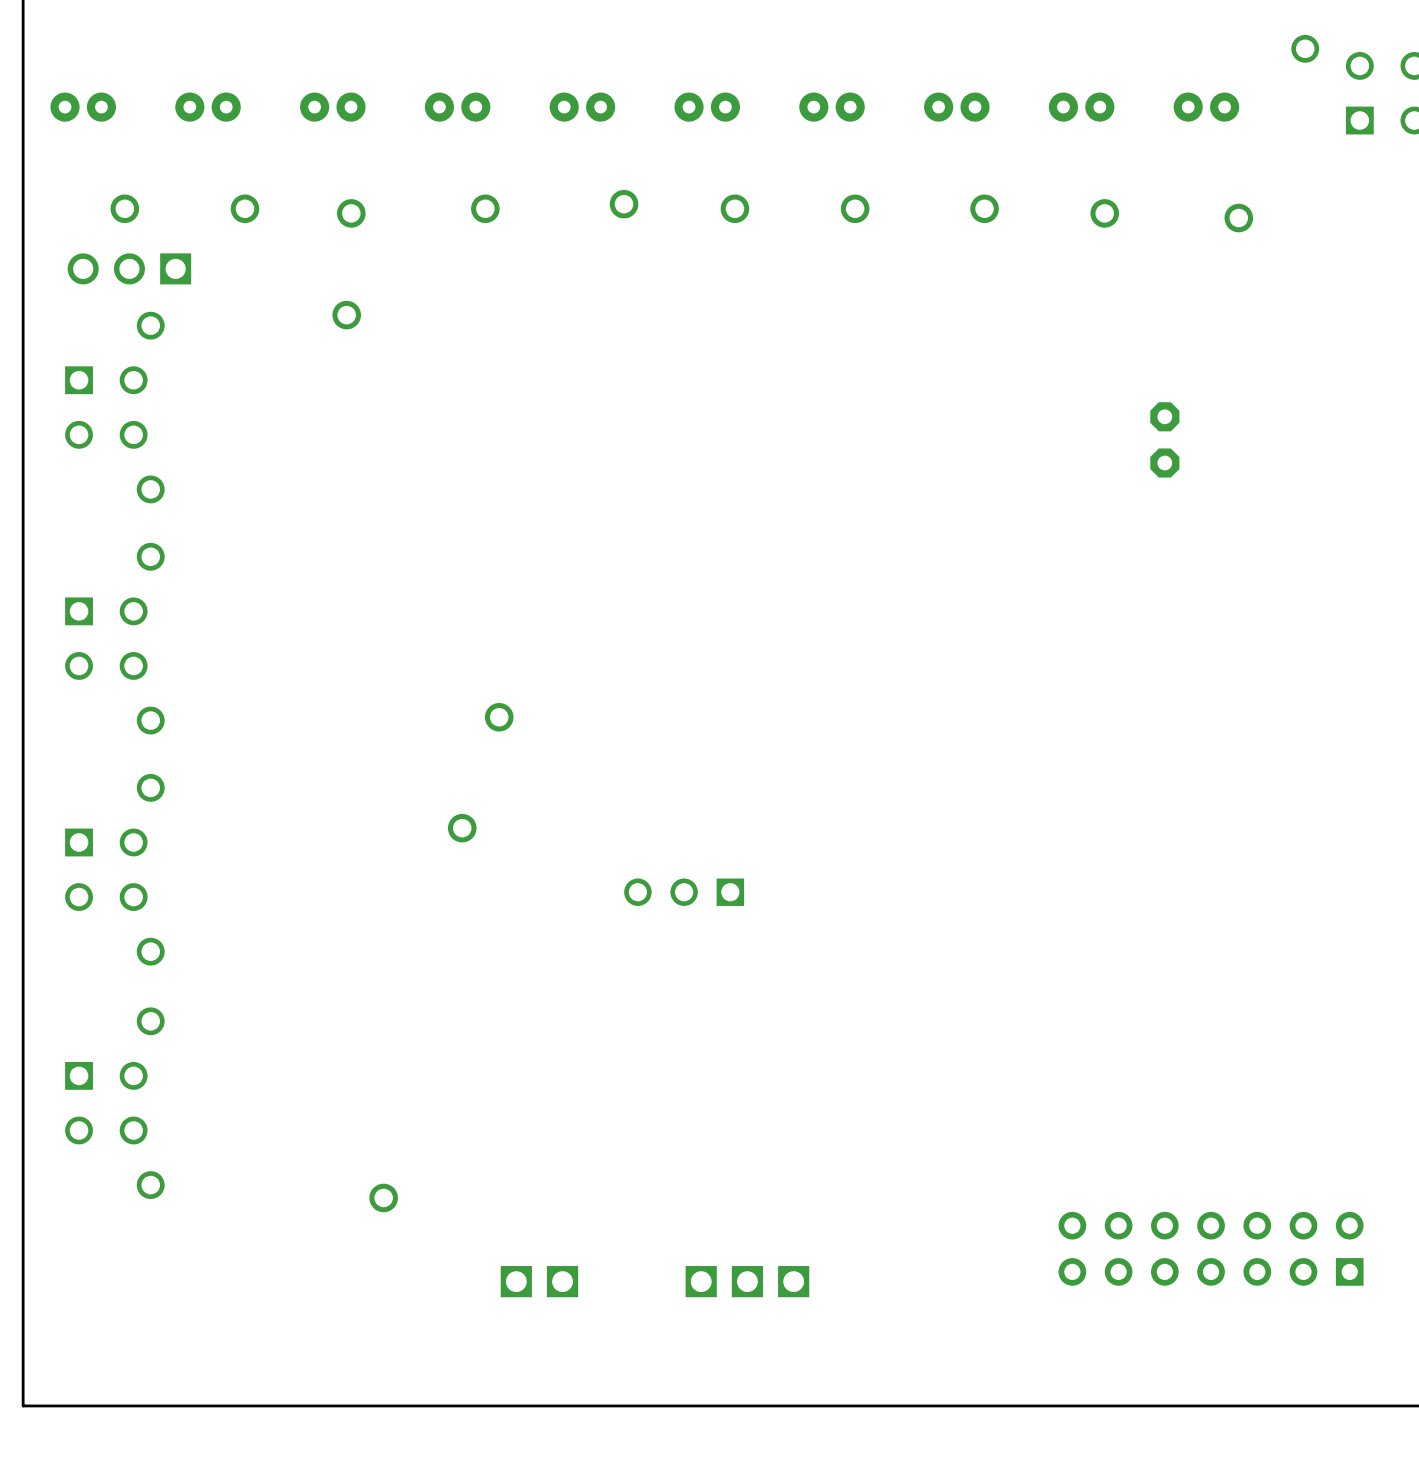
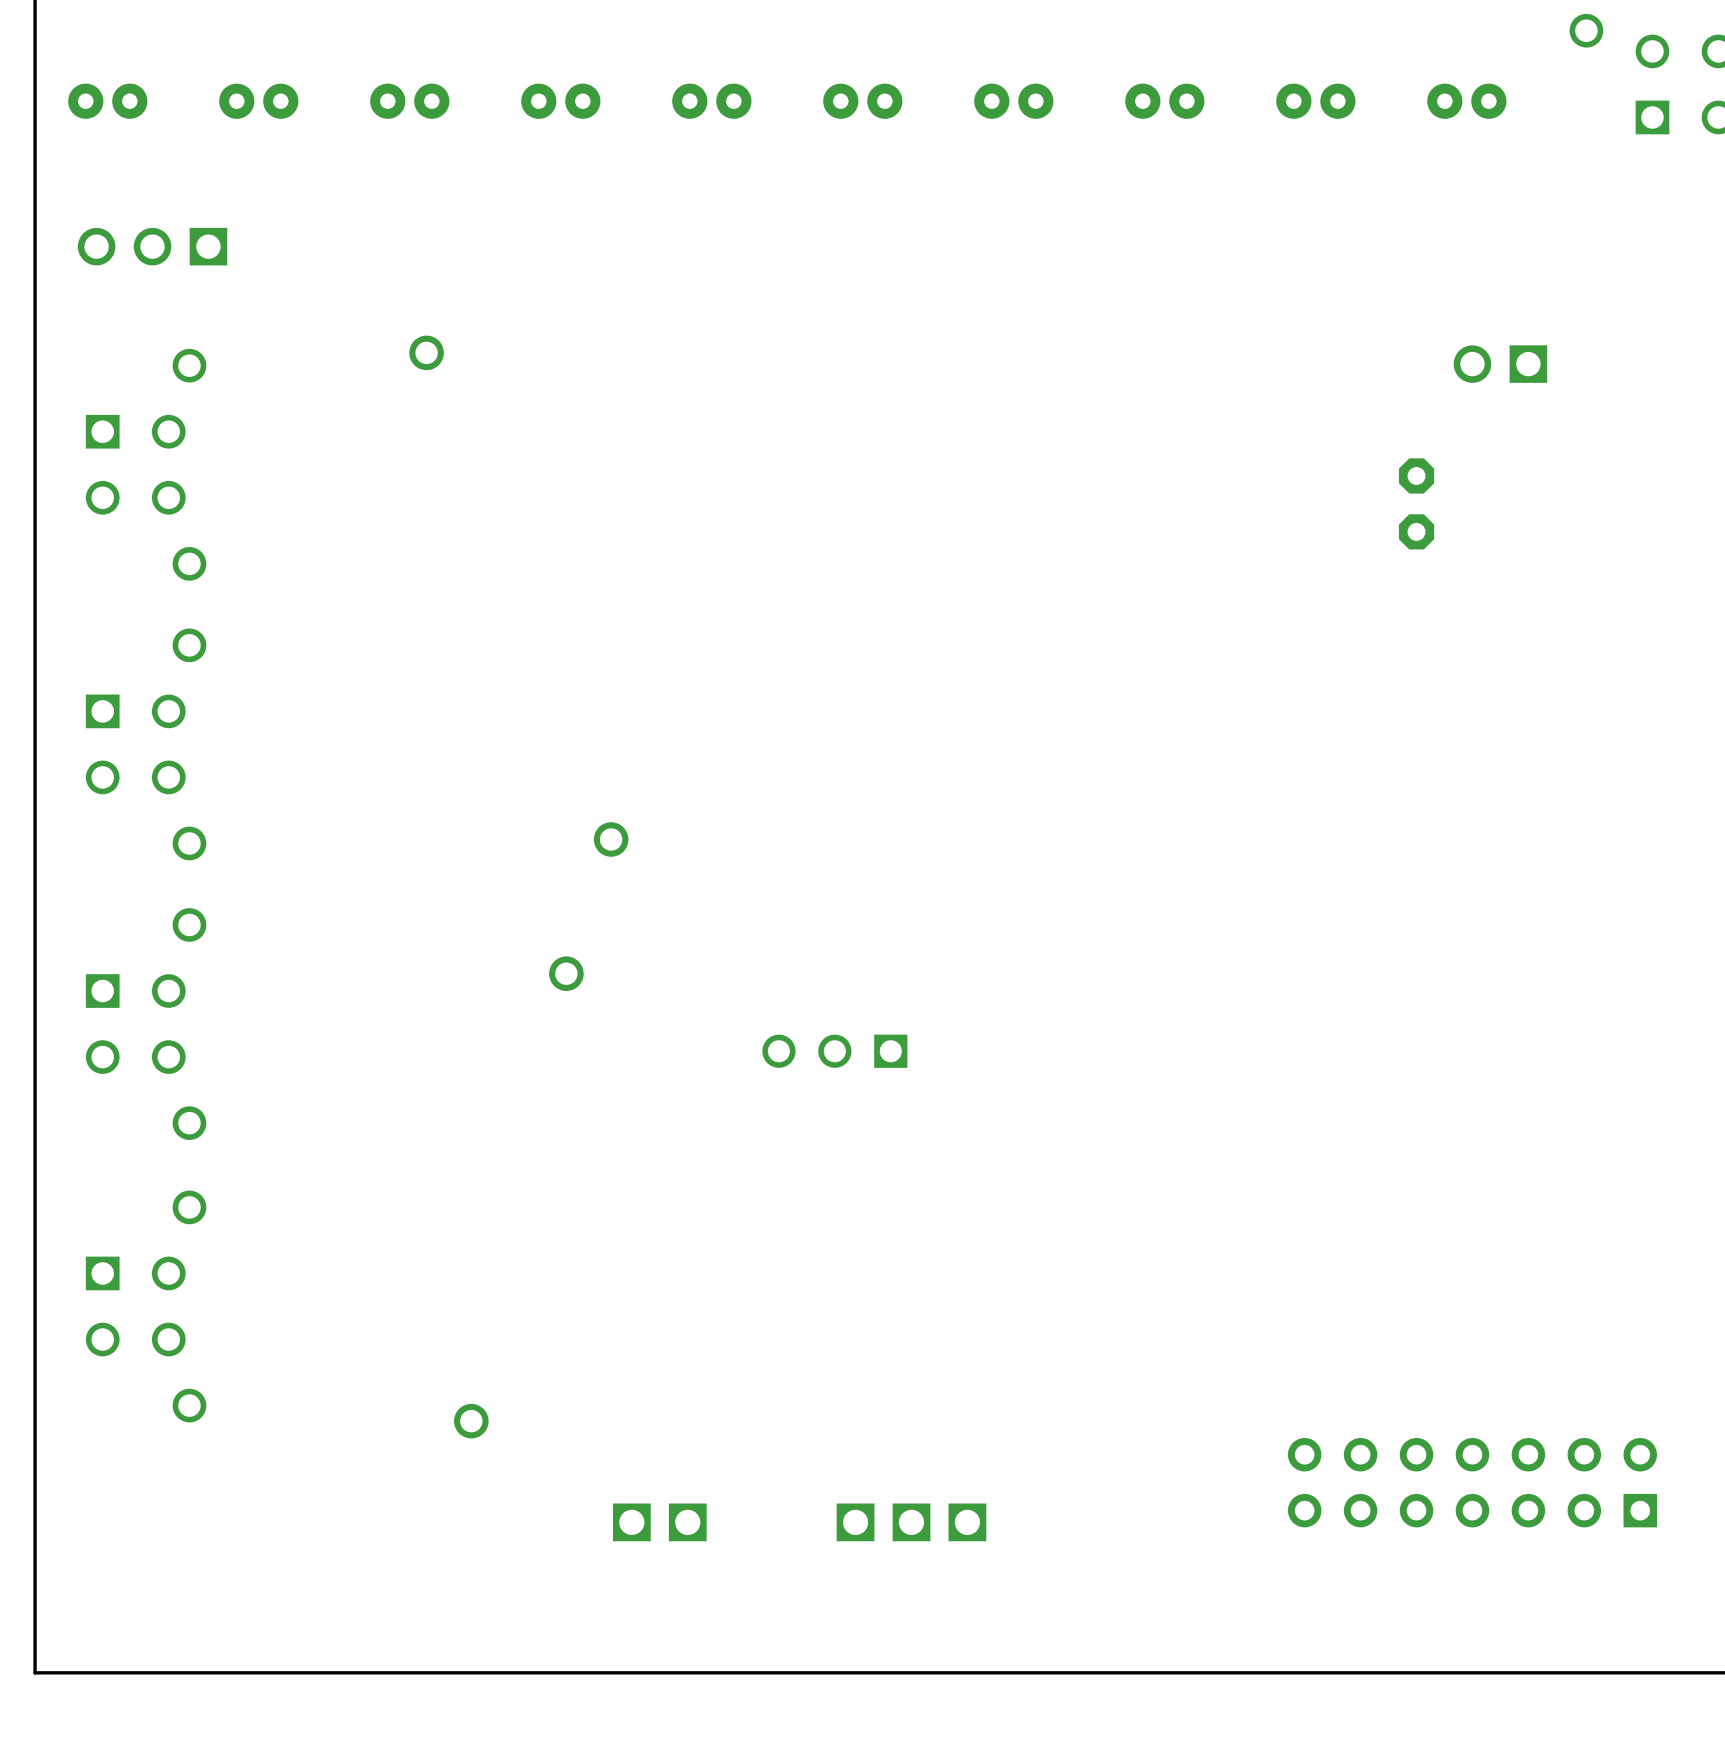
part: (624, 204) -> none
part: (124, 208) -> none
part: (245, 208) -> none
part: (485, 208) -> none
part: (734, 208) -> none
part: (855, 208) -> none
part: (984, 208) -> none
part: (351, 213) -> none
part: (1104, 213) -> none
part: (1238, 218) -> none
part position: (129, 268) -> (152, 246)
part: none -> (1500, 364)

